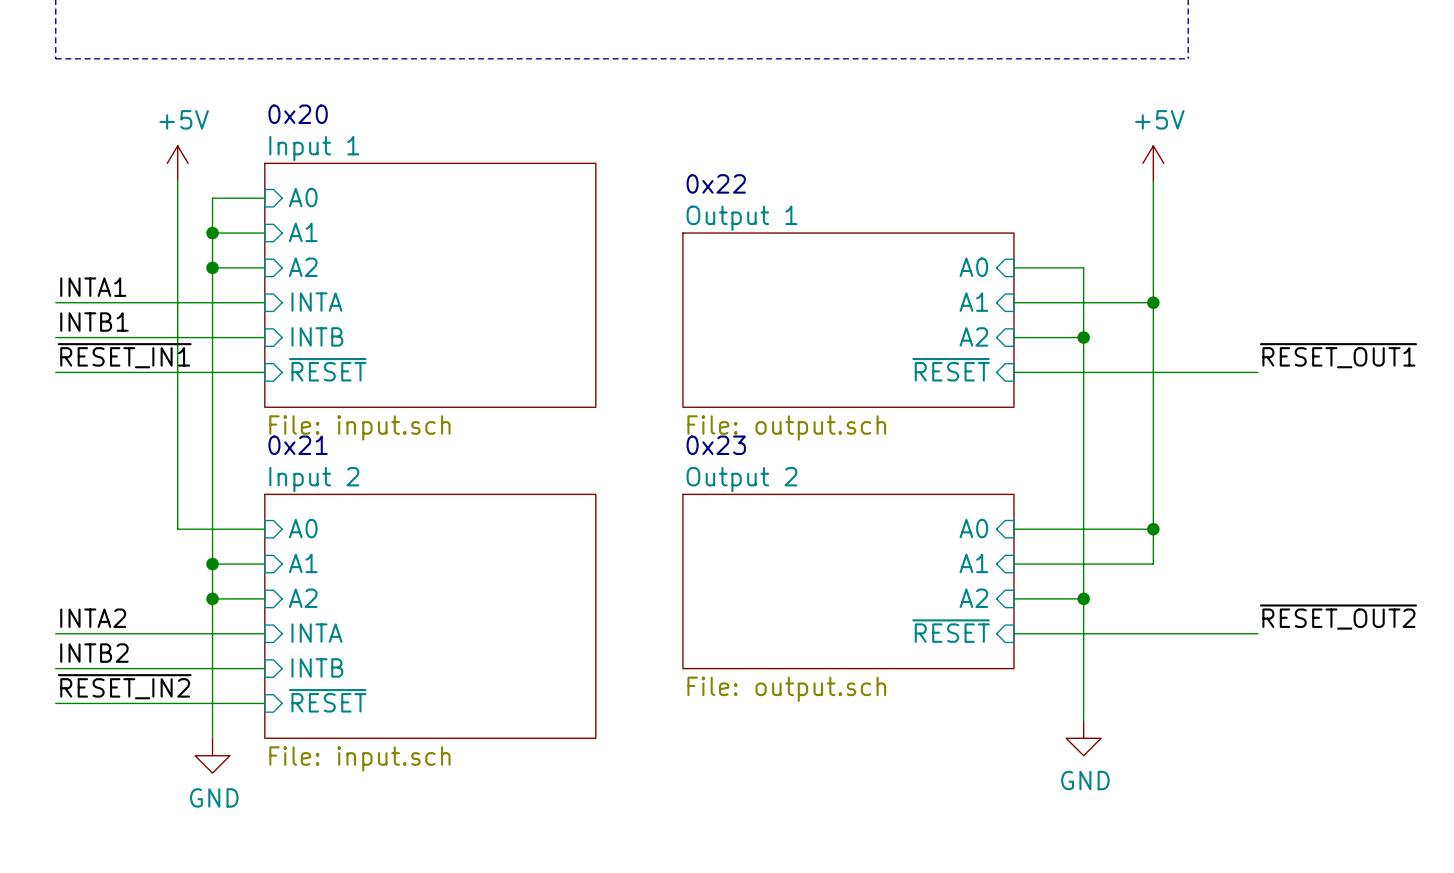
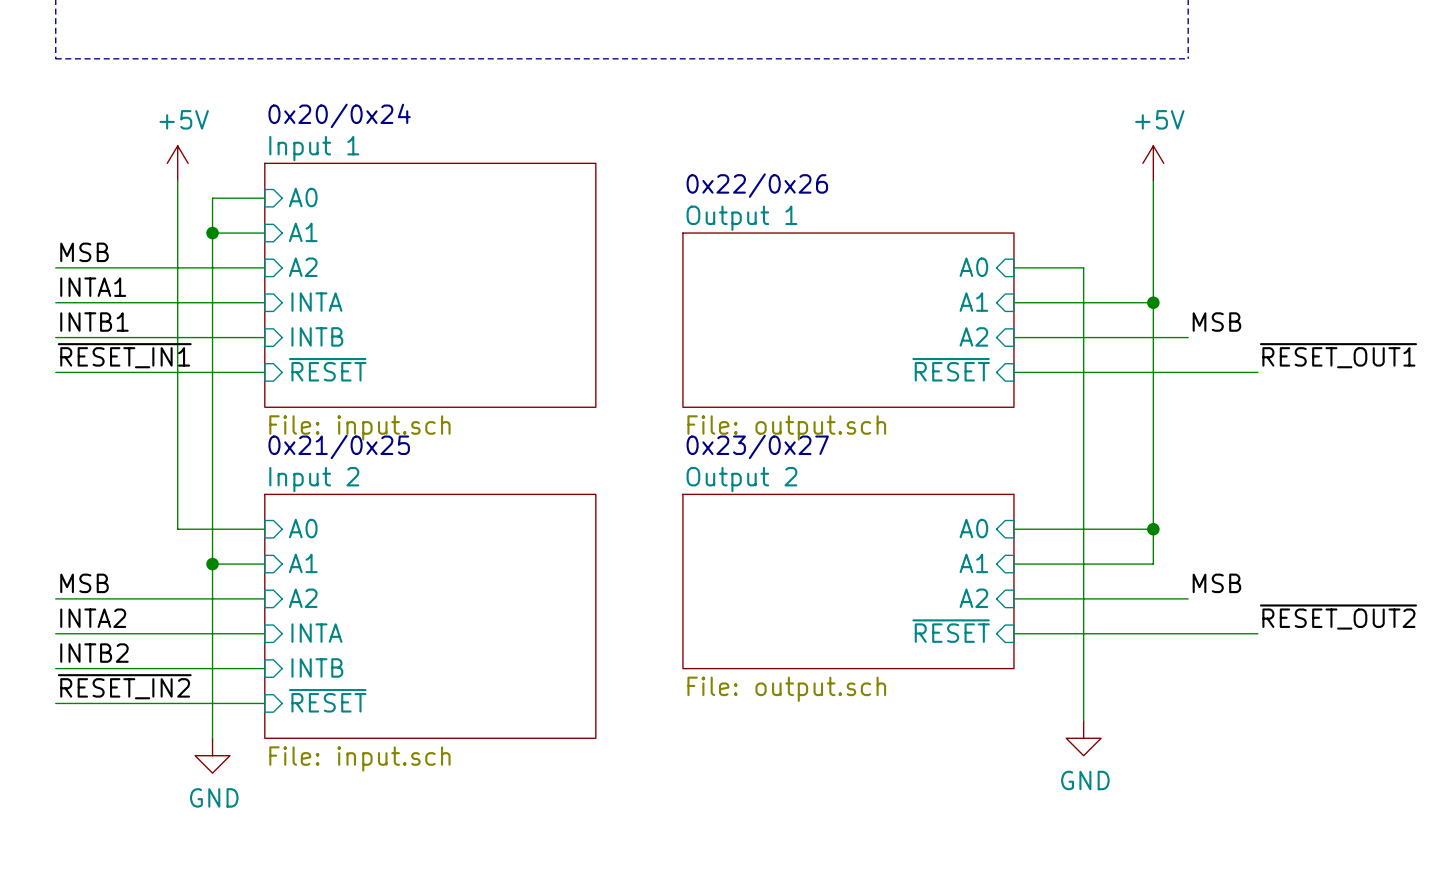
text: 0x20 (298, 114) -> 0x20/0x24 (339, 115)
text: 0x22 (716, 183) -> 0x22/0x26 (757, 185)
label: none -> MSB (84, 252)
wire: none -> (55, 267) (212, 267)
junction: (212, 267) -> none
label: none -> MSB (1216, 322)
wire: none -> (1083, 337) (1188, 337)
junction: (1083, 337) -> none
text: 0x21 (298, 445) -> 0x21/0x25 (339, 446)
text: 0x23 (716, 445) -> 0x23/0x27 (757, 446)
label: none -> MSB (84, 583)
label: none -> MSB (1216, 583)
wire: none -> (55, 598) (212, 598)
junction: (212, 598) -> none
wire: none -> (1083, 598) (1188, 598)
junction: (1083, 598) -> none

